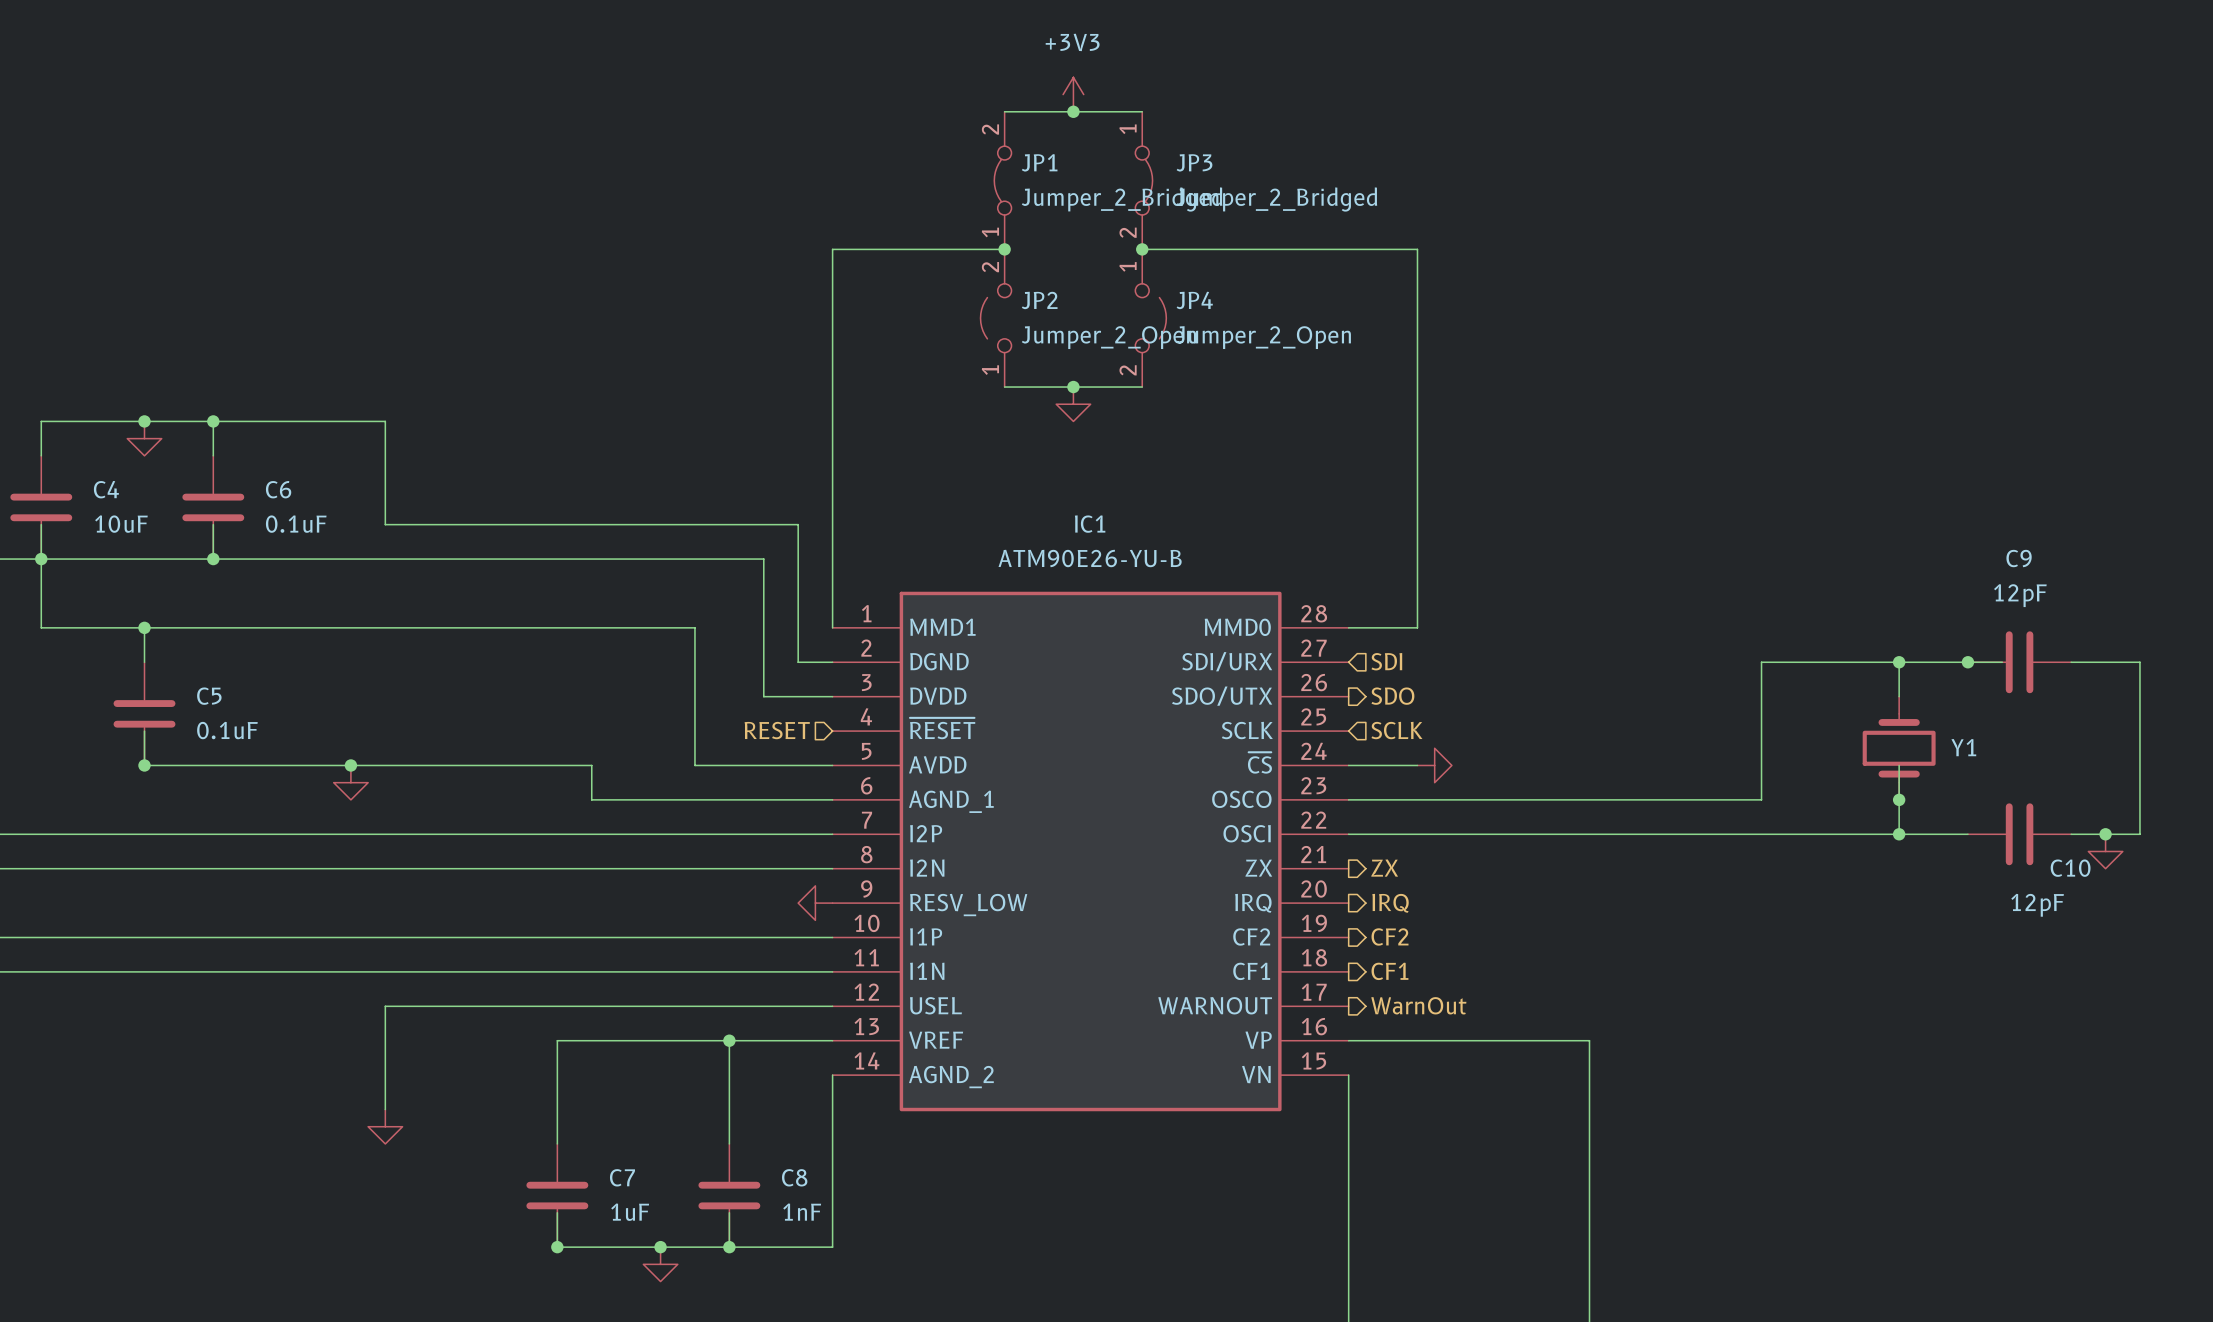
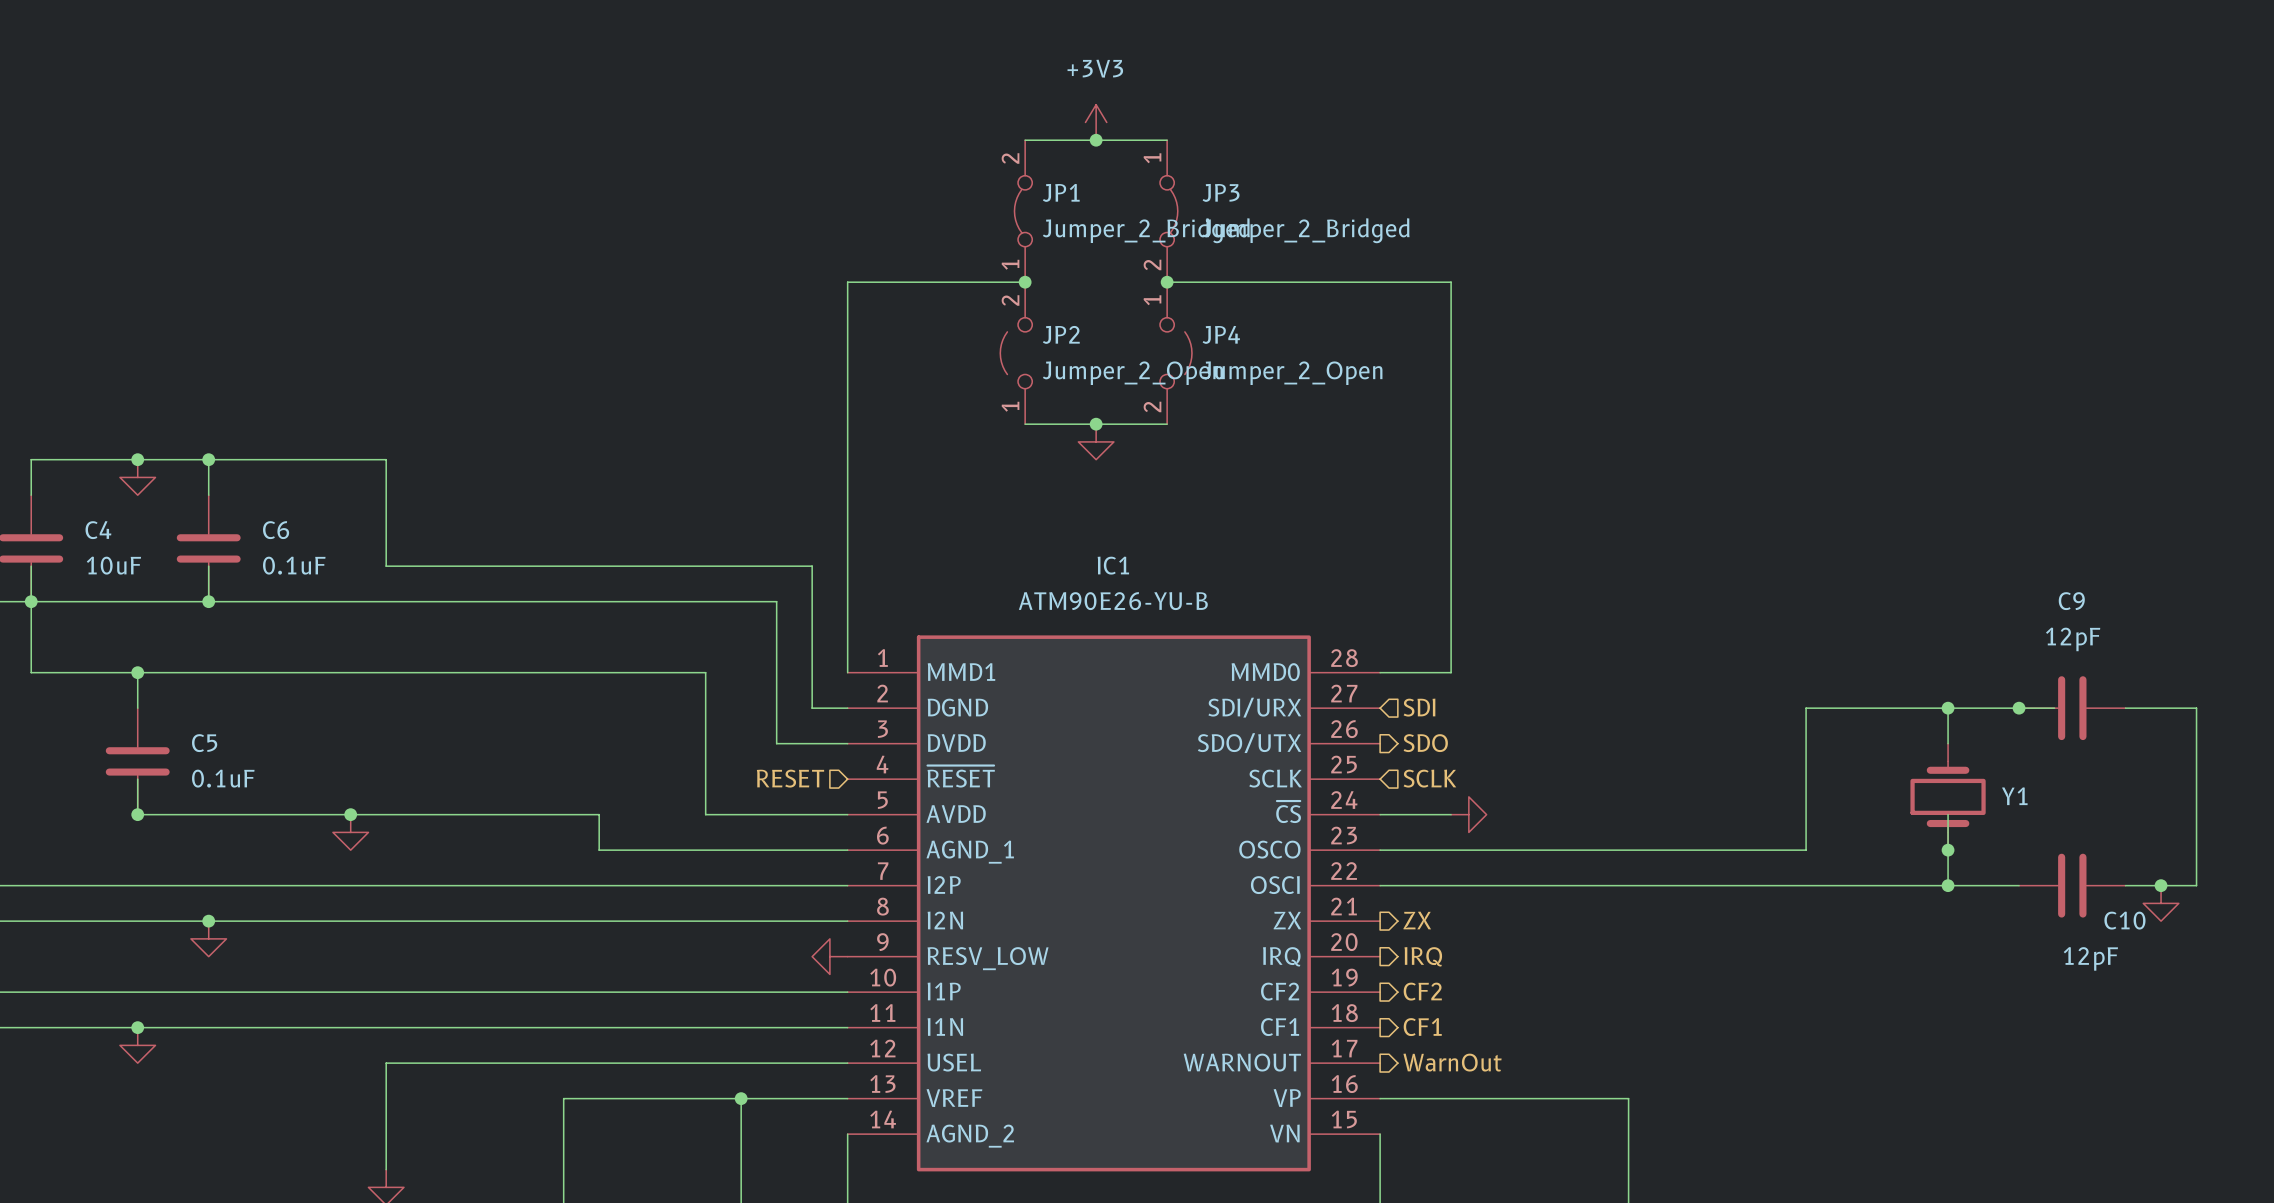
junction: none -> (208, 921)
power symbol: none -> (208, 938)
junction: none -> (137, 1027)
power symbol: none -> (137, 1045)

